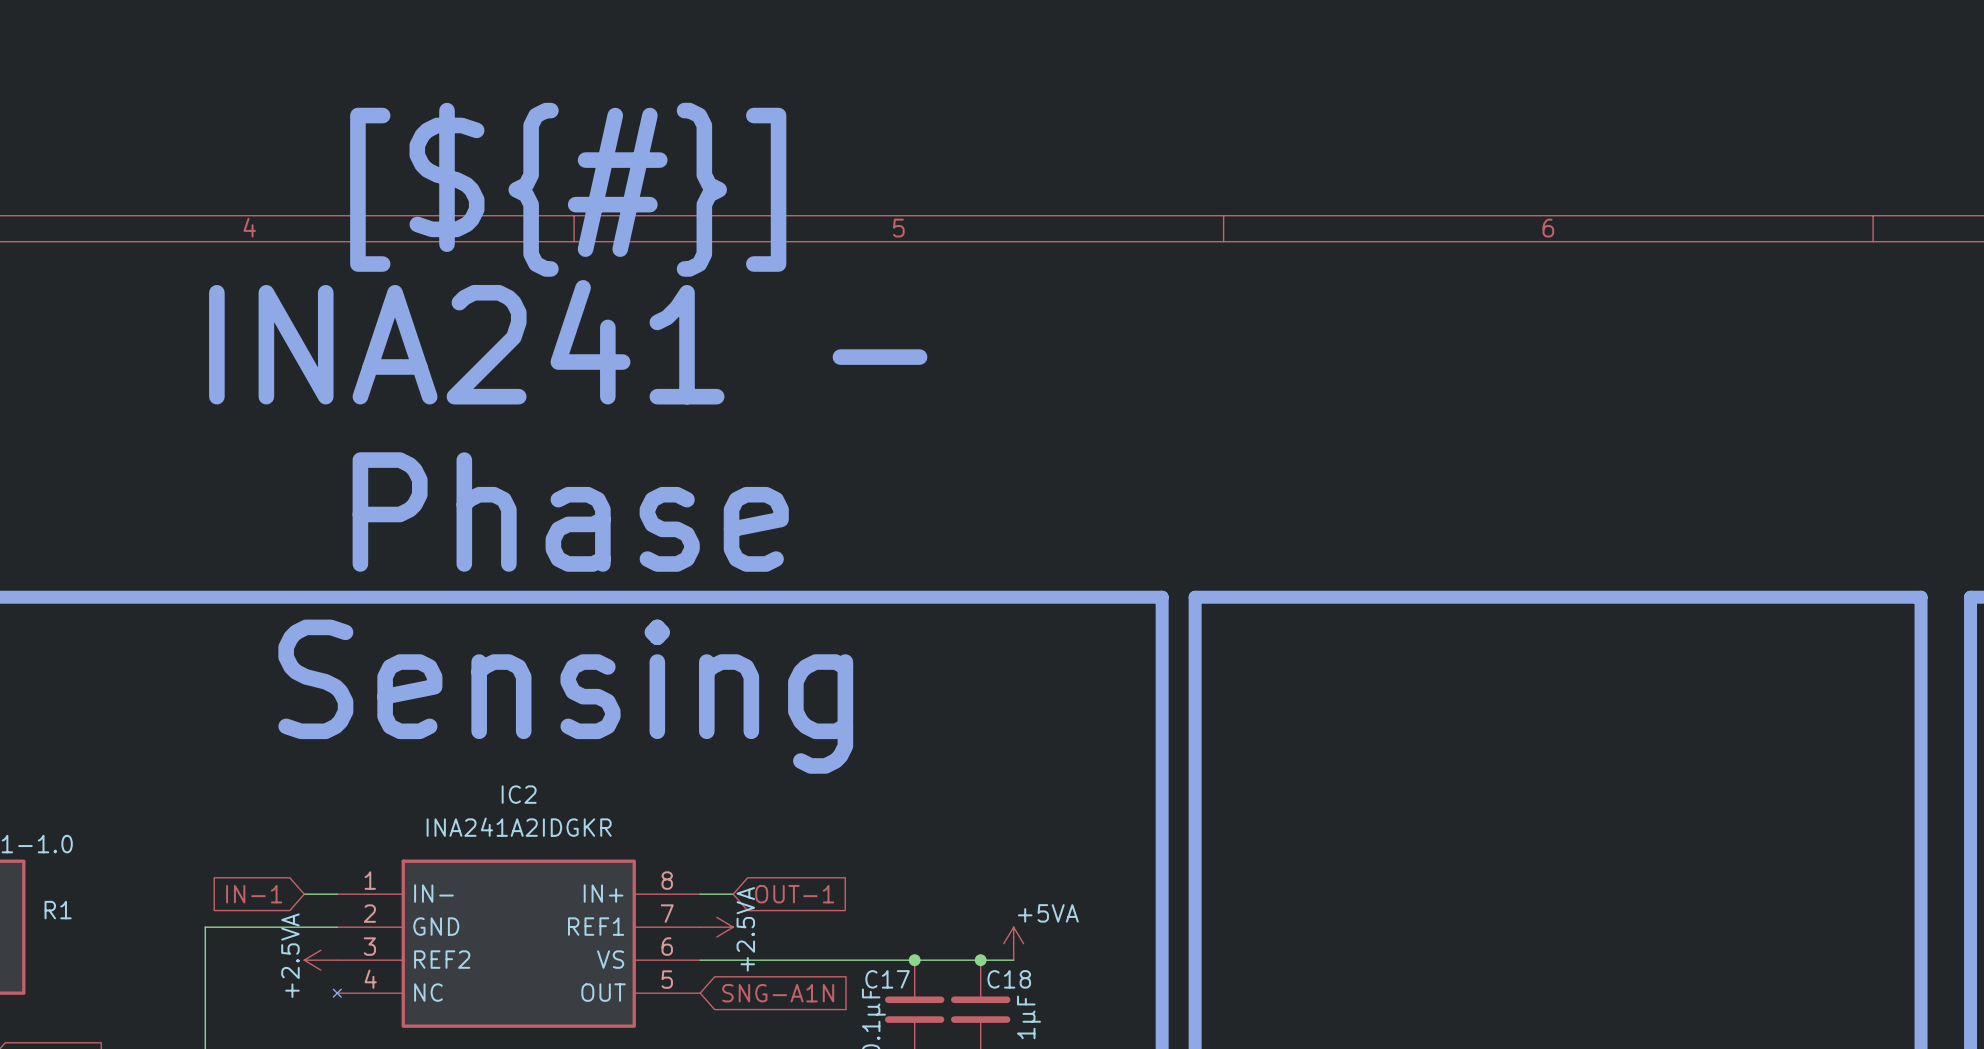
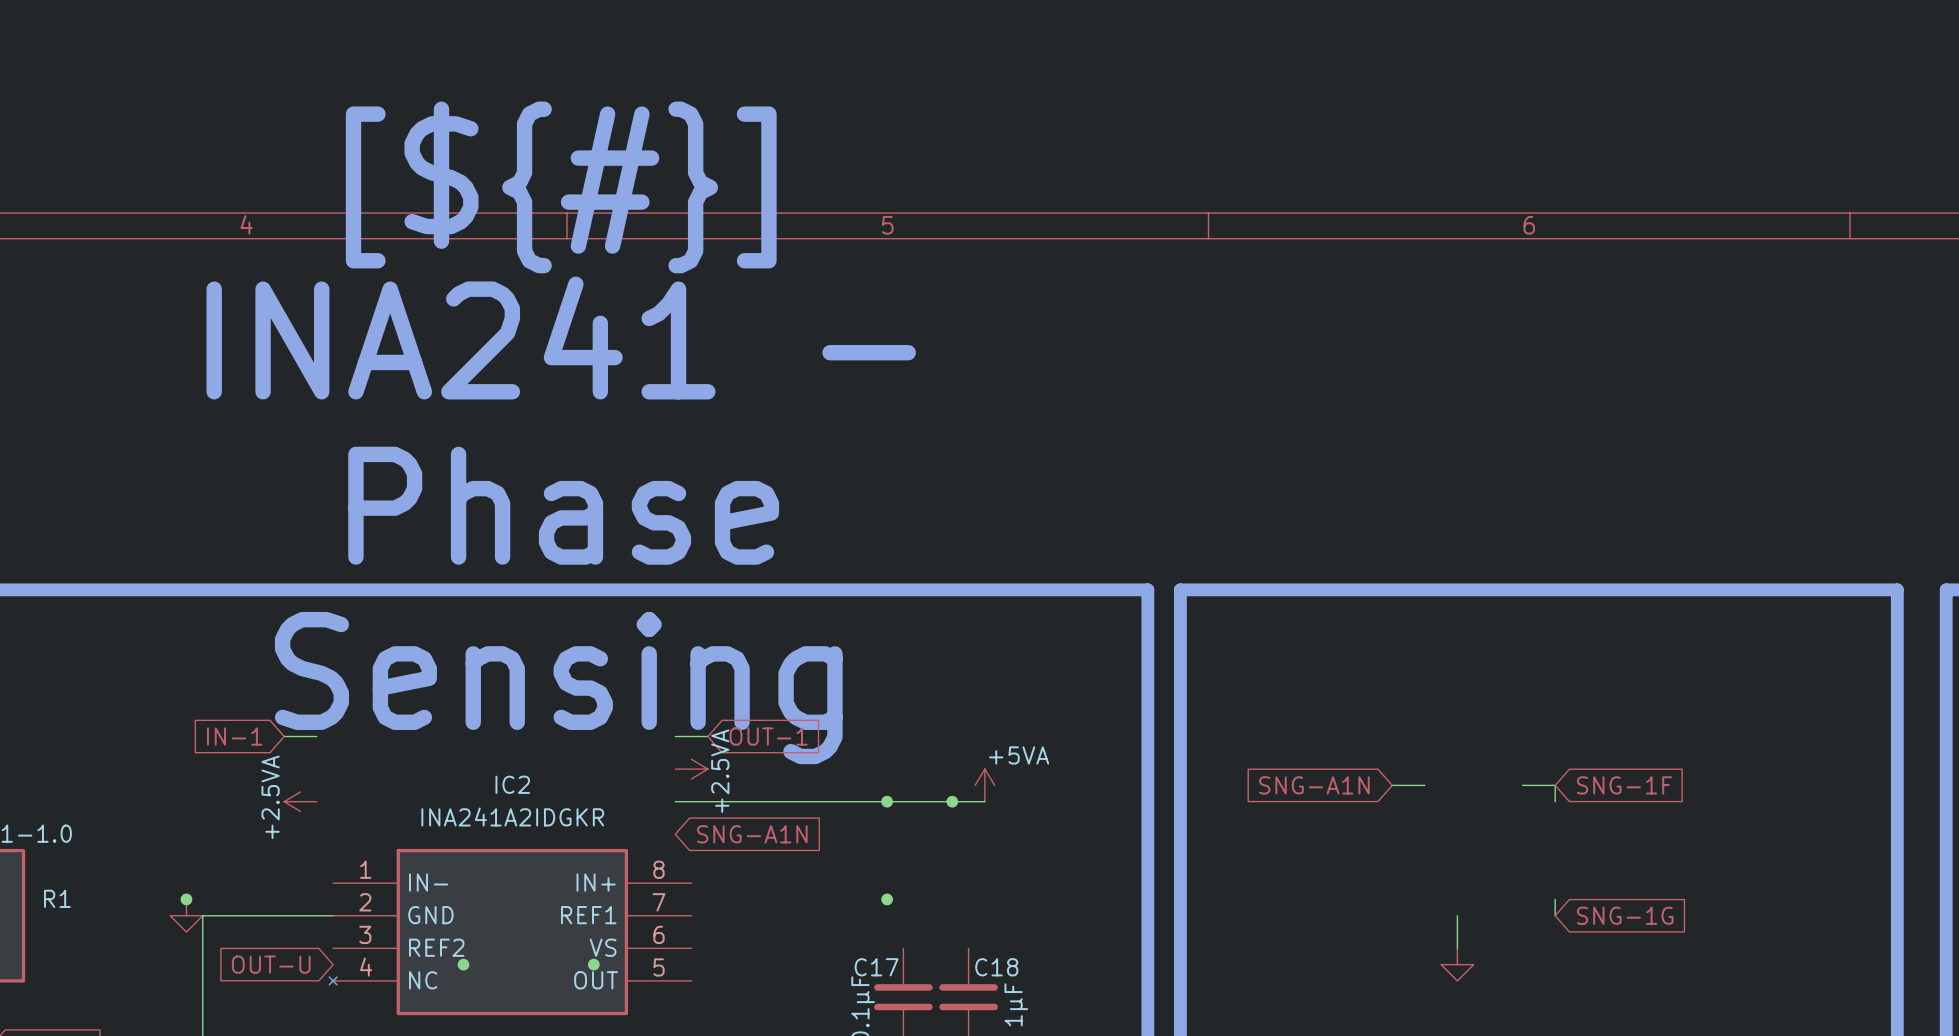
global label: none -> SNG-A1N (1314, 785)
wire: none -> (1392, 785) (1424, 785)
wire: none -> (1522, 785) (1555, 785) (1555, 801)
global label: none -> SNG-1F (1624, 785)
junction: none -> (887, 801)
junction: none -> (952, 801)
global label position: IN-1 (254, 894) -> IN-1 (234, 736)
wire: (304, 894) (337, 894) -> (284, 736) (316, 736)
wire: (700, 894) (733, 894) -> (675, 736) (707, 736)
global label position: OUT-1 (794, 894) -> OUT-1 (768, 736)
junction: none -> (186, 899)
junction: none -> (887, 899)
wire: none -> (1555, 899) (1555, 915)
power symbol: none -> (186, 915)
power symbol position: +2.5VA (716, 927) -> +2.5VA (691, 769)
wire: none -> (1457, 915) (1457, 948)
global label: none -> SNG-1G (1625, 915)
power symbol position: +5VA (1013, 943) -> +5VA (984, 785)
power symbol position: +2.5VA (320, 960) -> +2.5VA (300, 801)
wire: (700, 960) (1013, 960) -> (675, 801) (984, 801)
junction: (914, 960) -> none
junction: (980, 960) -> none
global label: none -> OUT-U (271, 964)
junction: none -> (463, 964)
junction: none -> (593, 964)
power symbol: none -> (1457, 964)
global label position: SNG-A1N (778, 993) -> SNG-A1N (752, 834)

